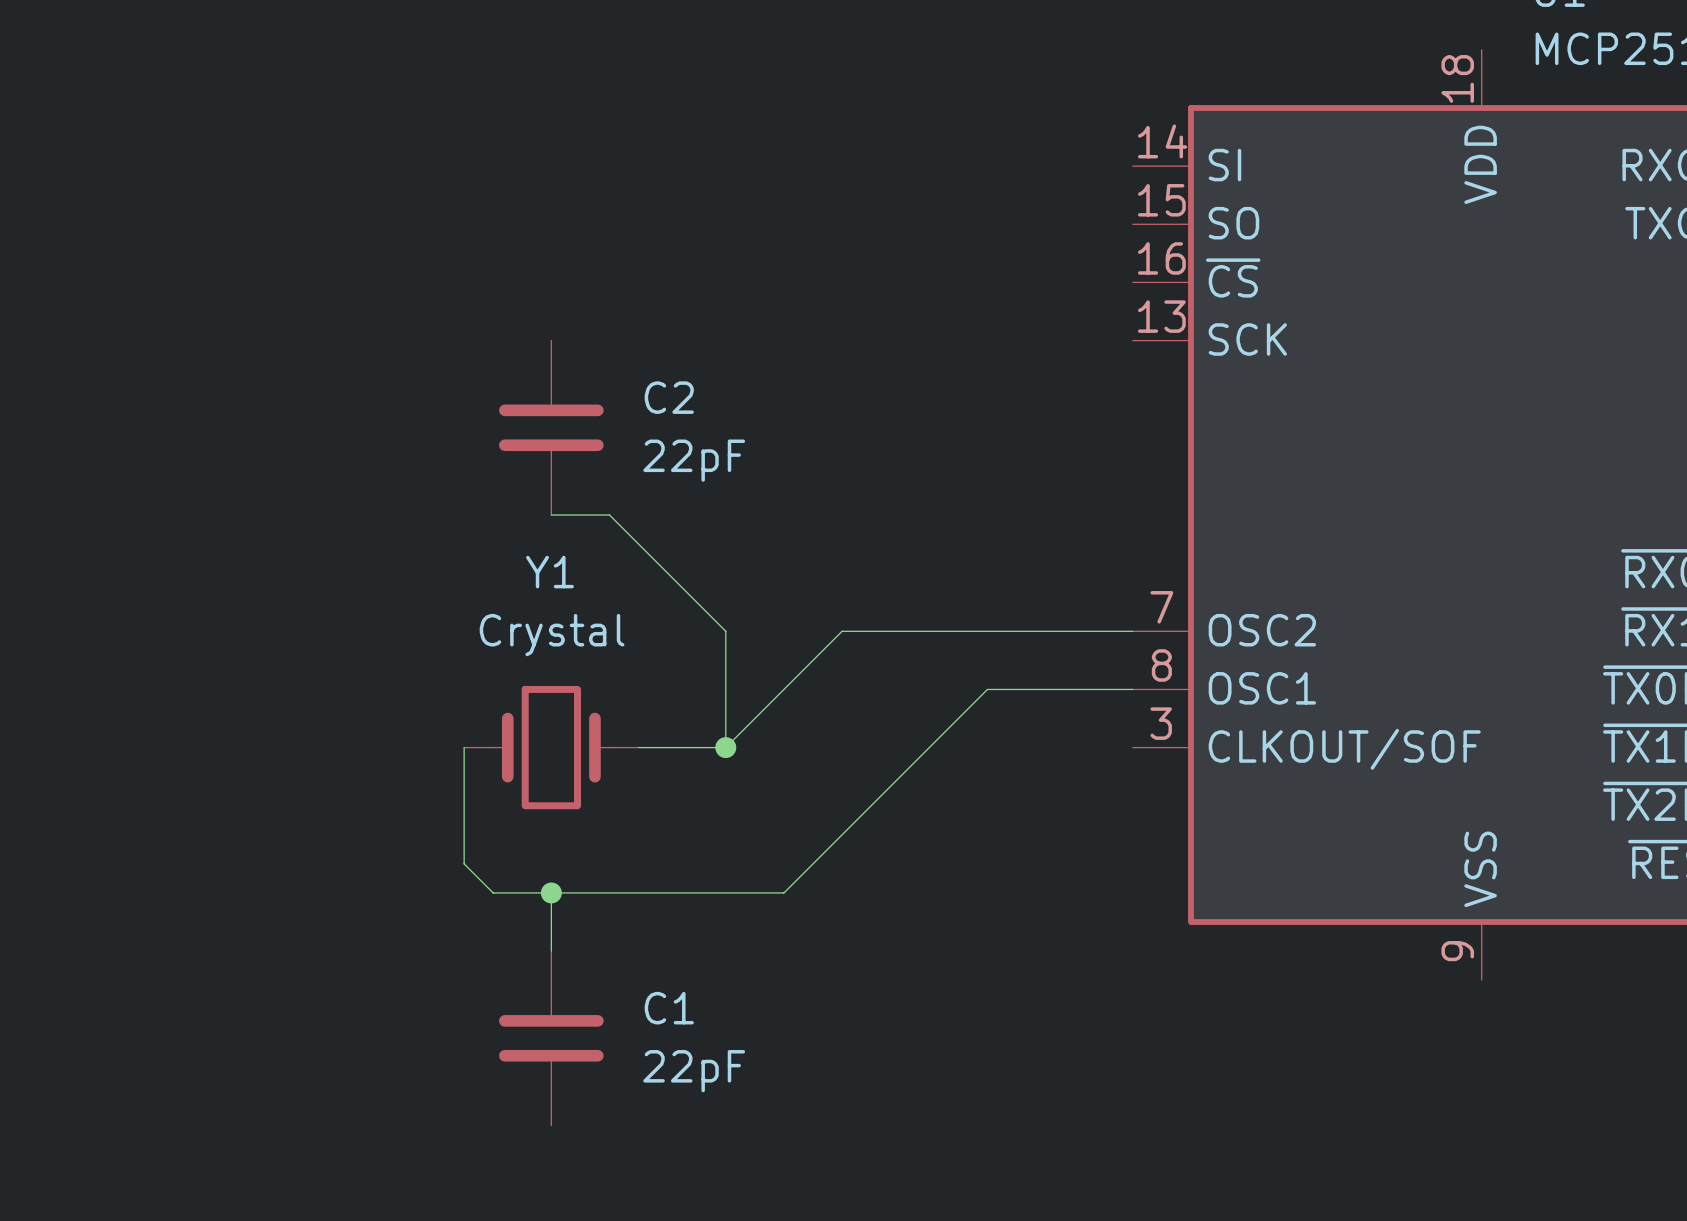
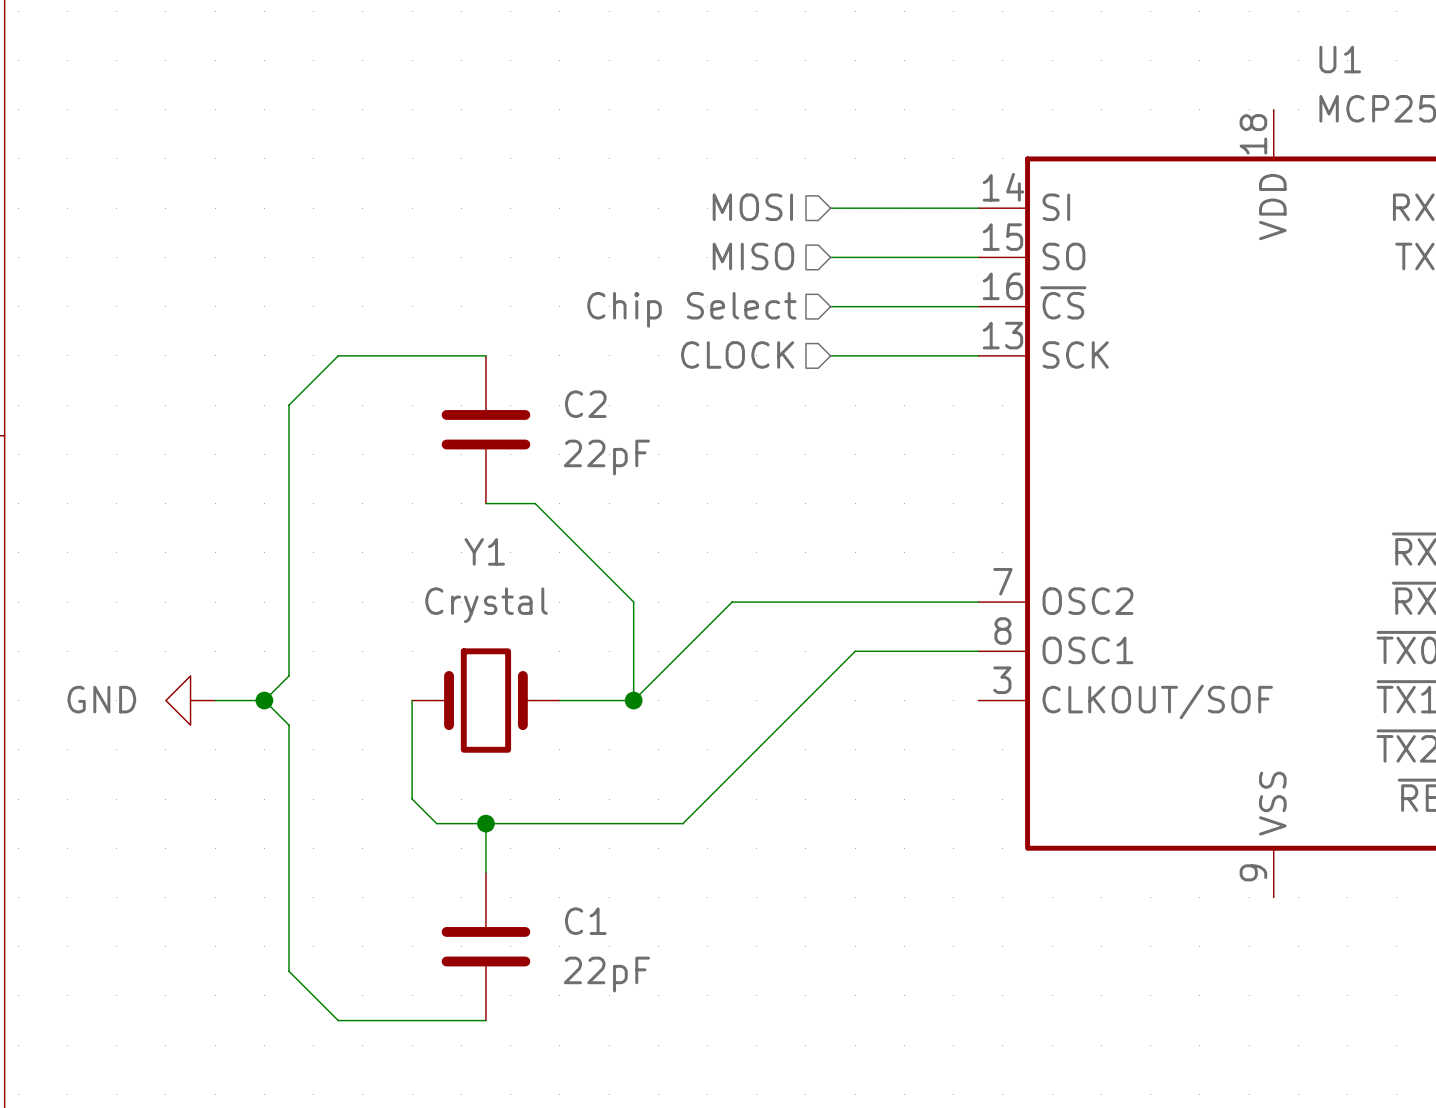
hierarchical label: none -> MOSI (752, 207)
wire: none -> (830, 208) (978, 208)
hierarchical label: none -> MISO (753, 256)
wire: none -> (830, 257) (978, 257)
wire: none -> (830, 306) (978, 306)
hierarchical label: none -> Chip Select (691, 309)
hierarchical label: none -> CLOCK (737, 354)
wire: none -> (485, 355) (338, 355) (289, 405) (289, 675) (264, 700)
wire: none -> (830, 355) (978, 355)
power symbol: none -> GND (190, 700)
wire: none -> (215, 700) (264, 700)
wire: none -> (264, 700) (289, 725) (289, 971) (338, 1020) (485, 1020)
junction: none -> (264, 700)

